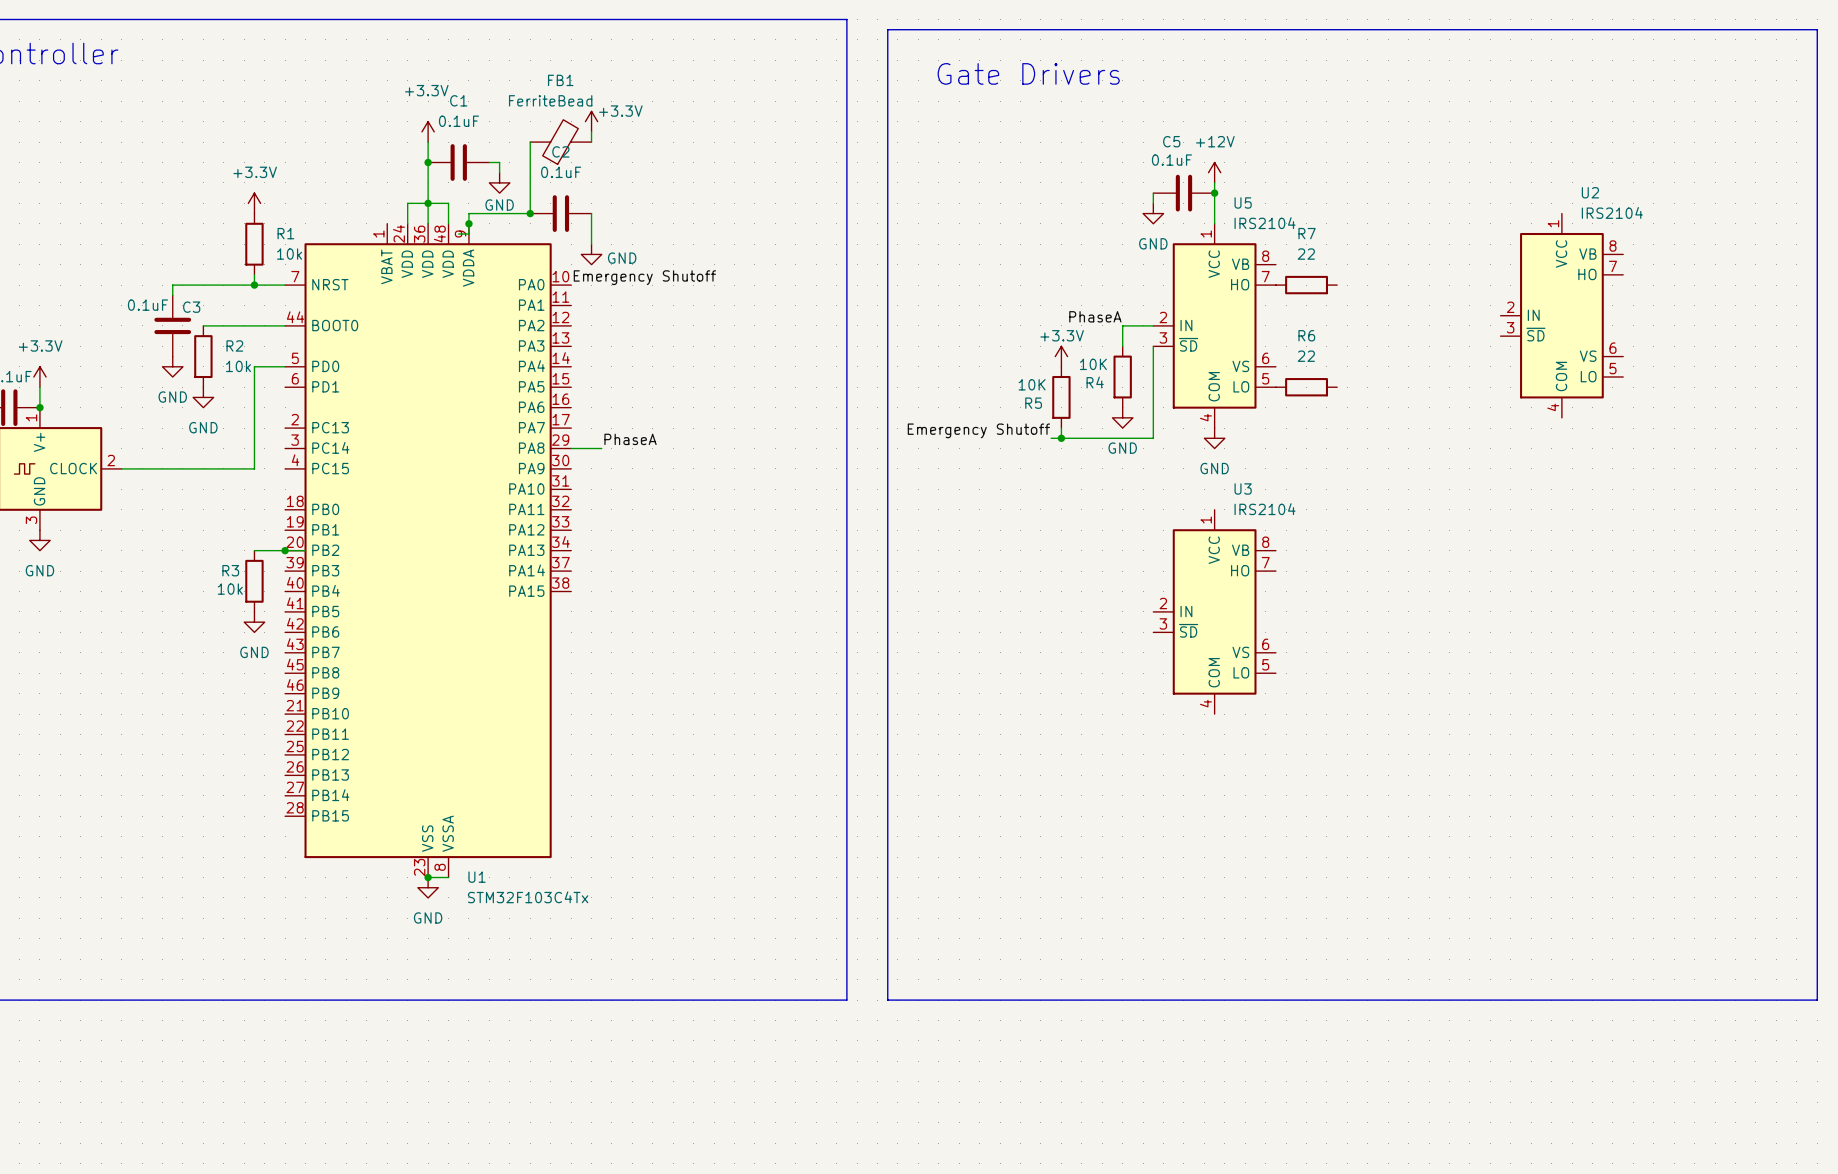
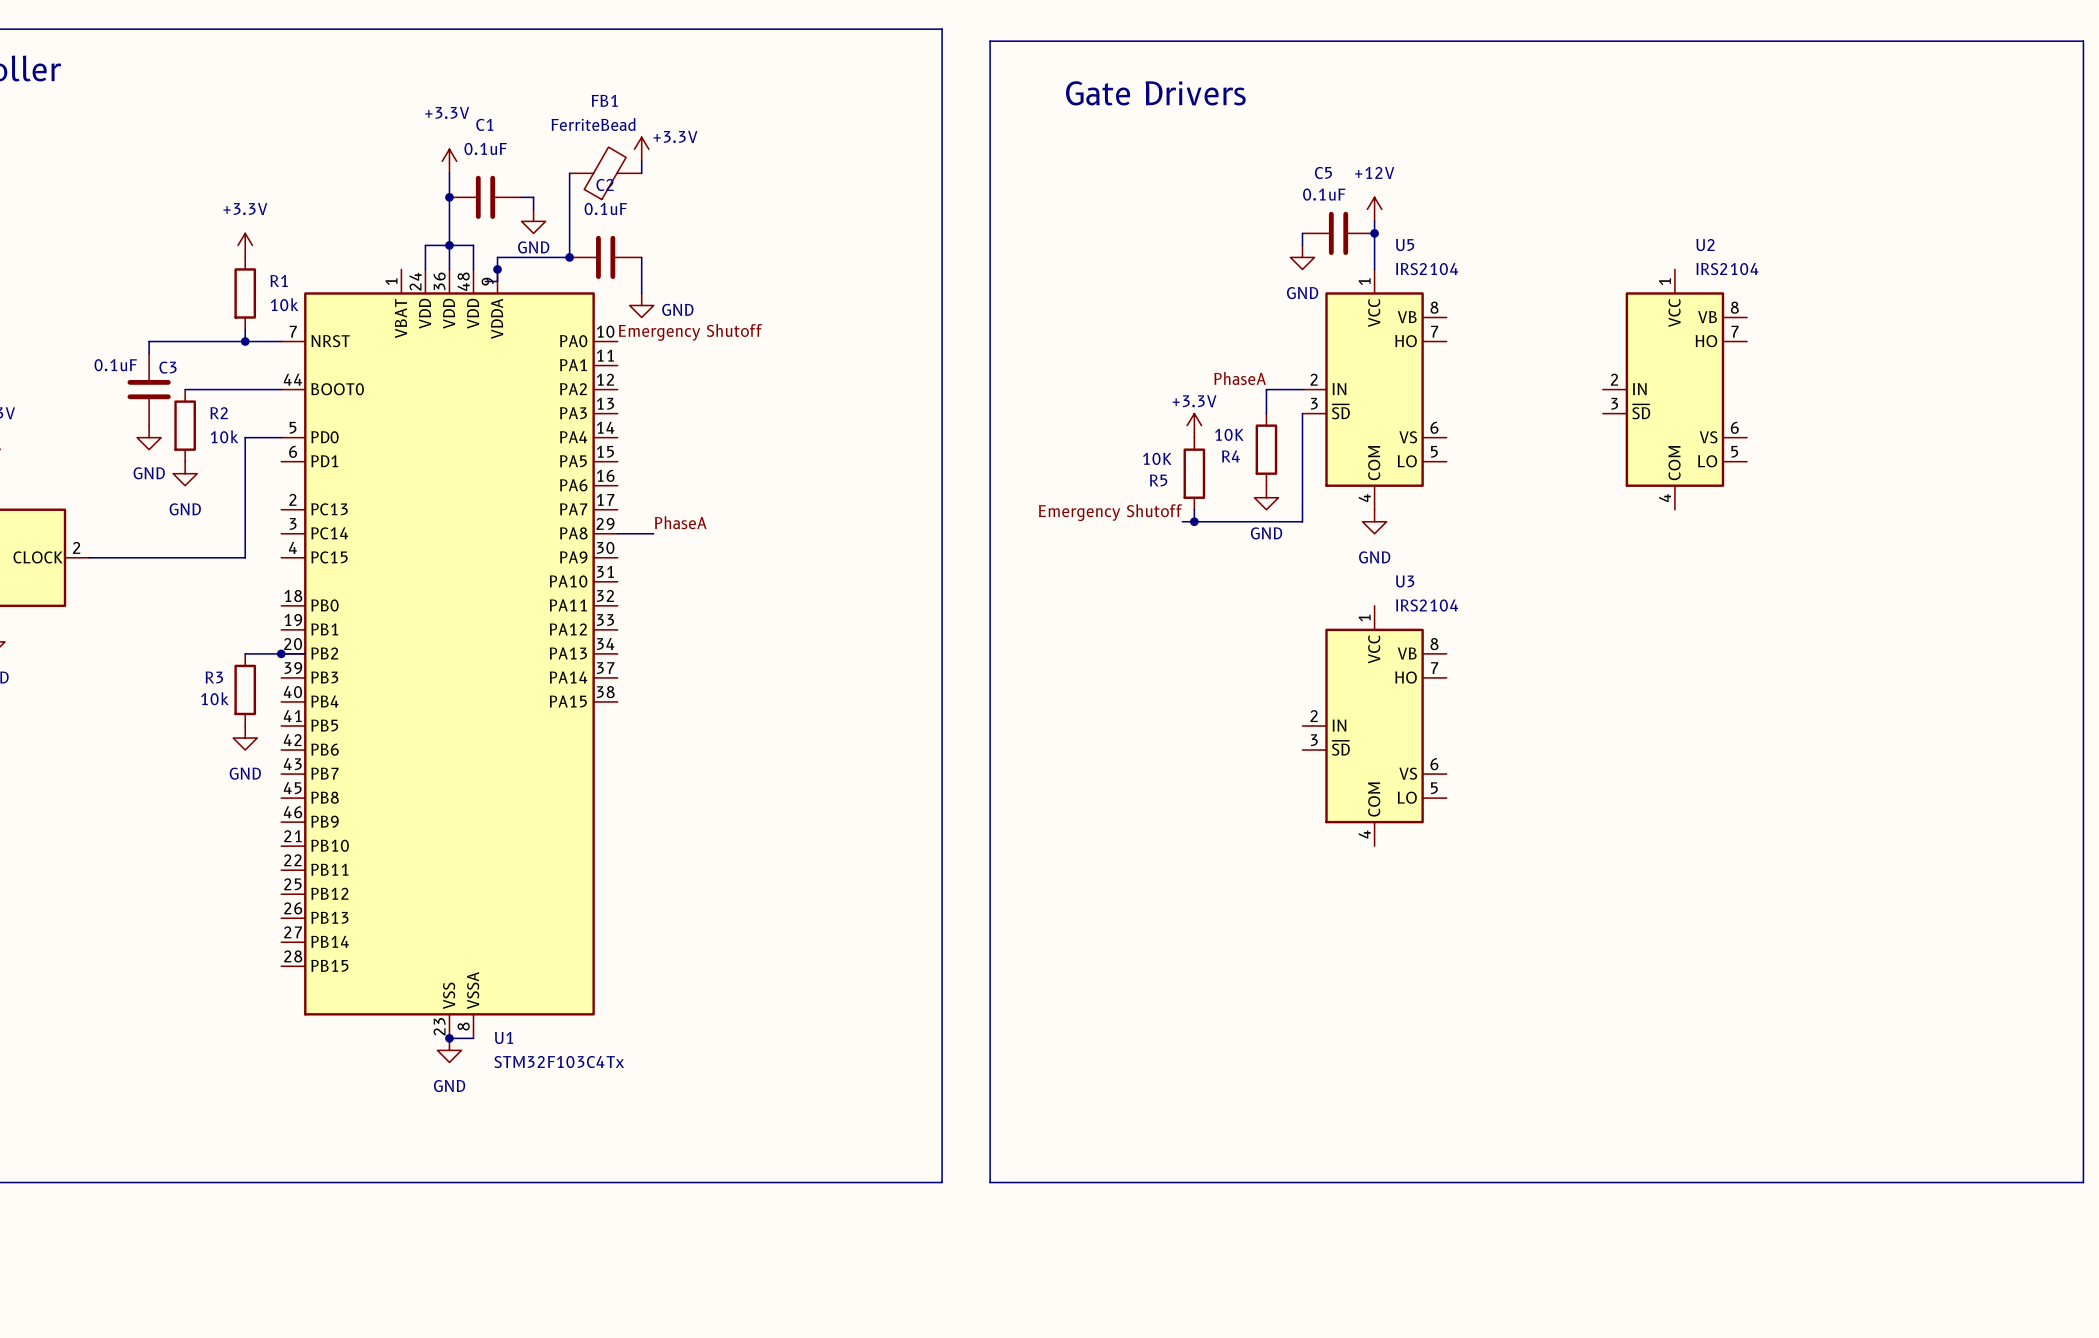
R7: 22 (1306, 285) -> none
U2 position: (1561, 315) -> (1674, 389)
R6: 22 (1306, 387) -> none

